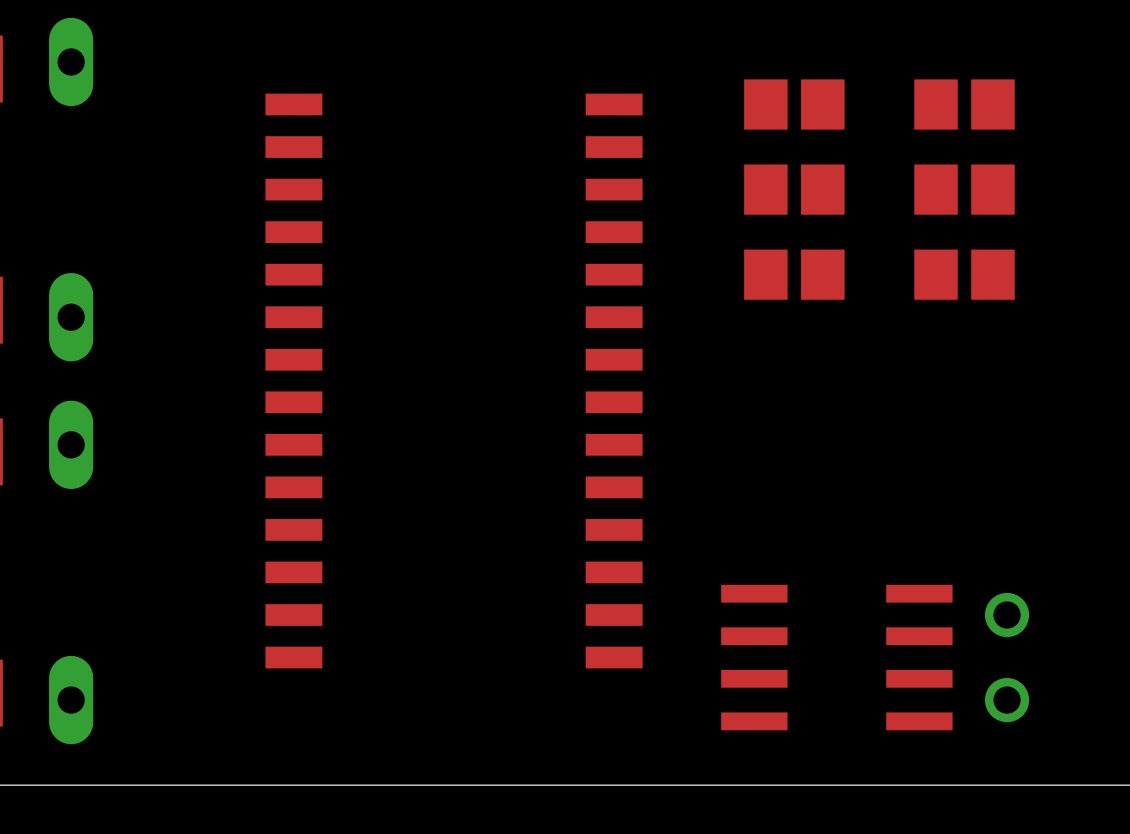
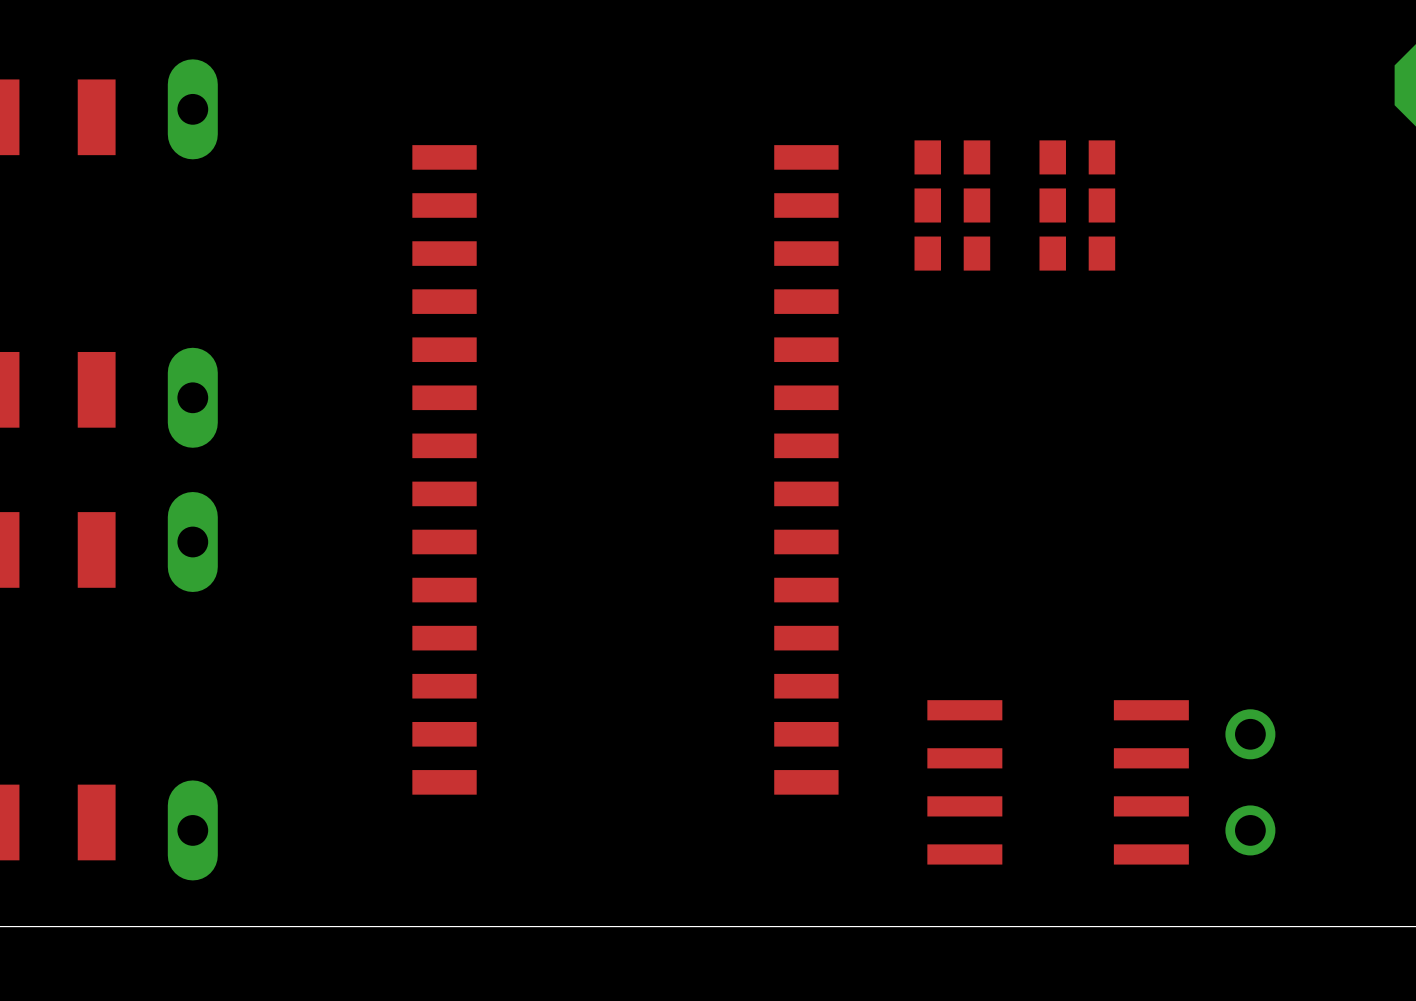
part: none -> (952, 157)
part: (794, 104) -> none
part: none -> (1077, 157)
part: (964, 104) -> none
part: none -> (952, 205)
part: none -> (1077, 205)
part: none -> (952, 253)
part: (794, 189) -> none
part: none -> (1077, 253)
part: (964, 189) -> none
part: (794, 274) -> none
part: (964, 274) -> none

